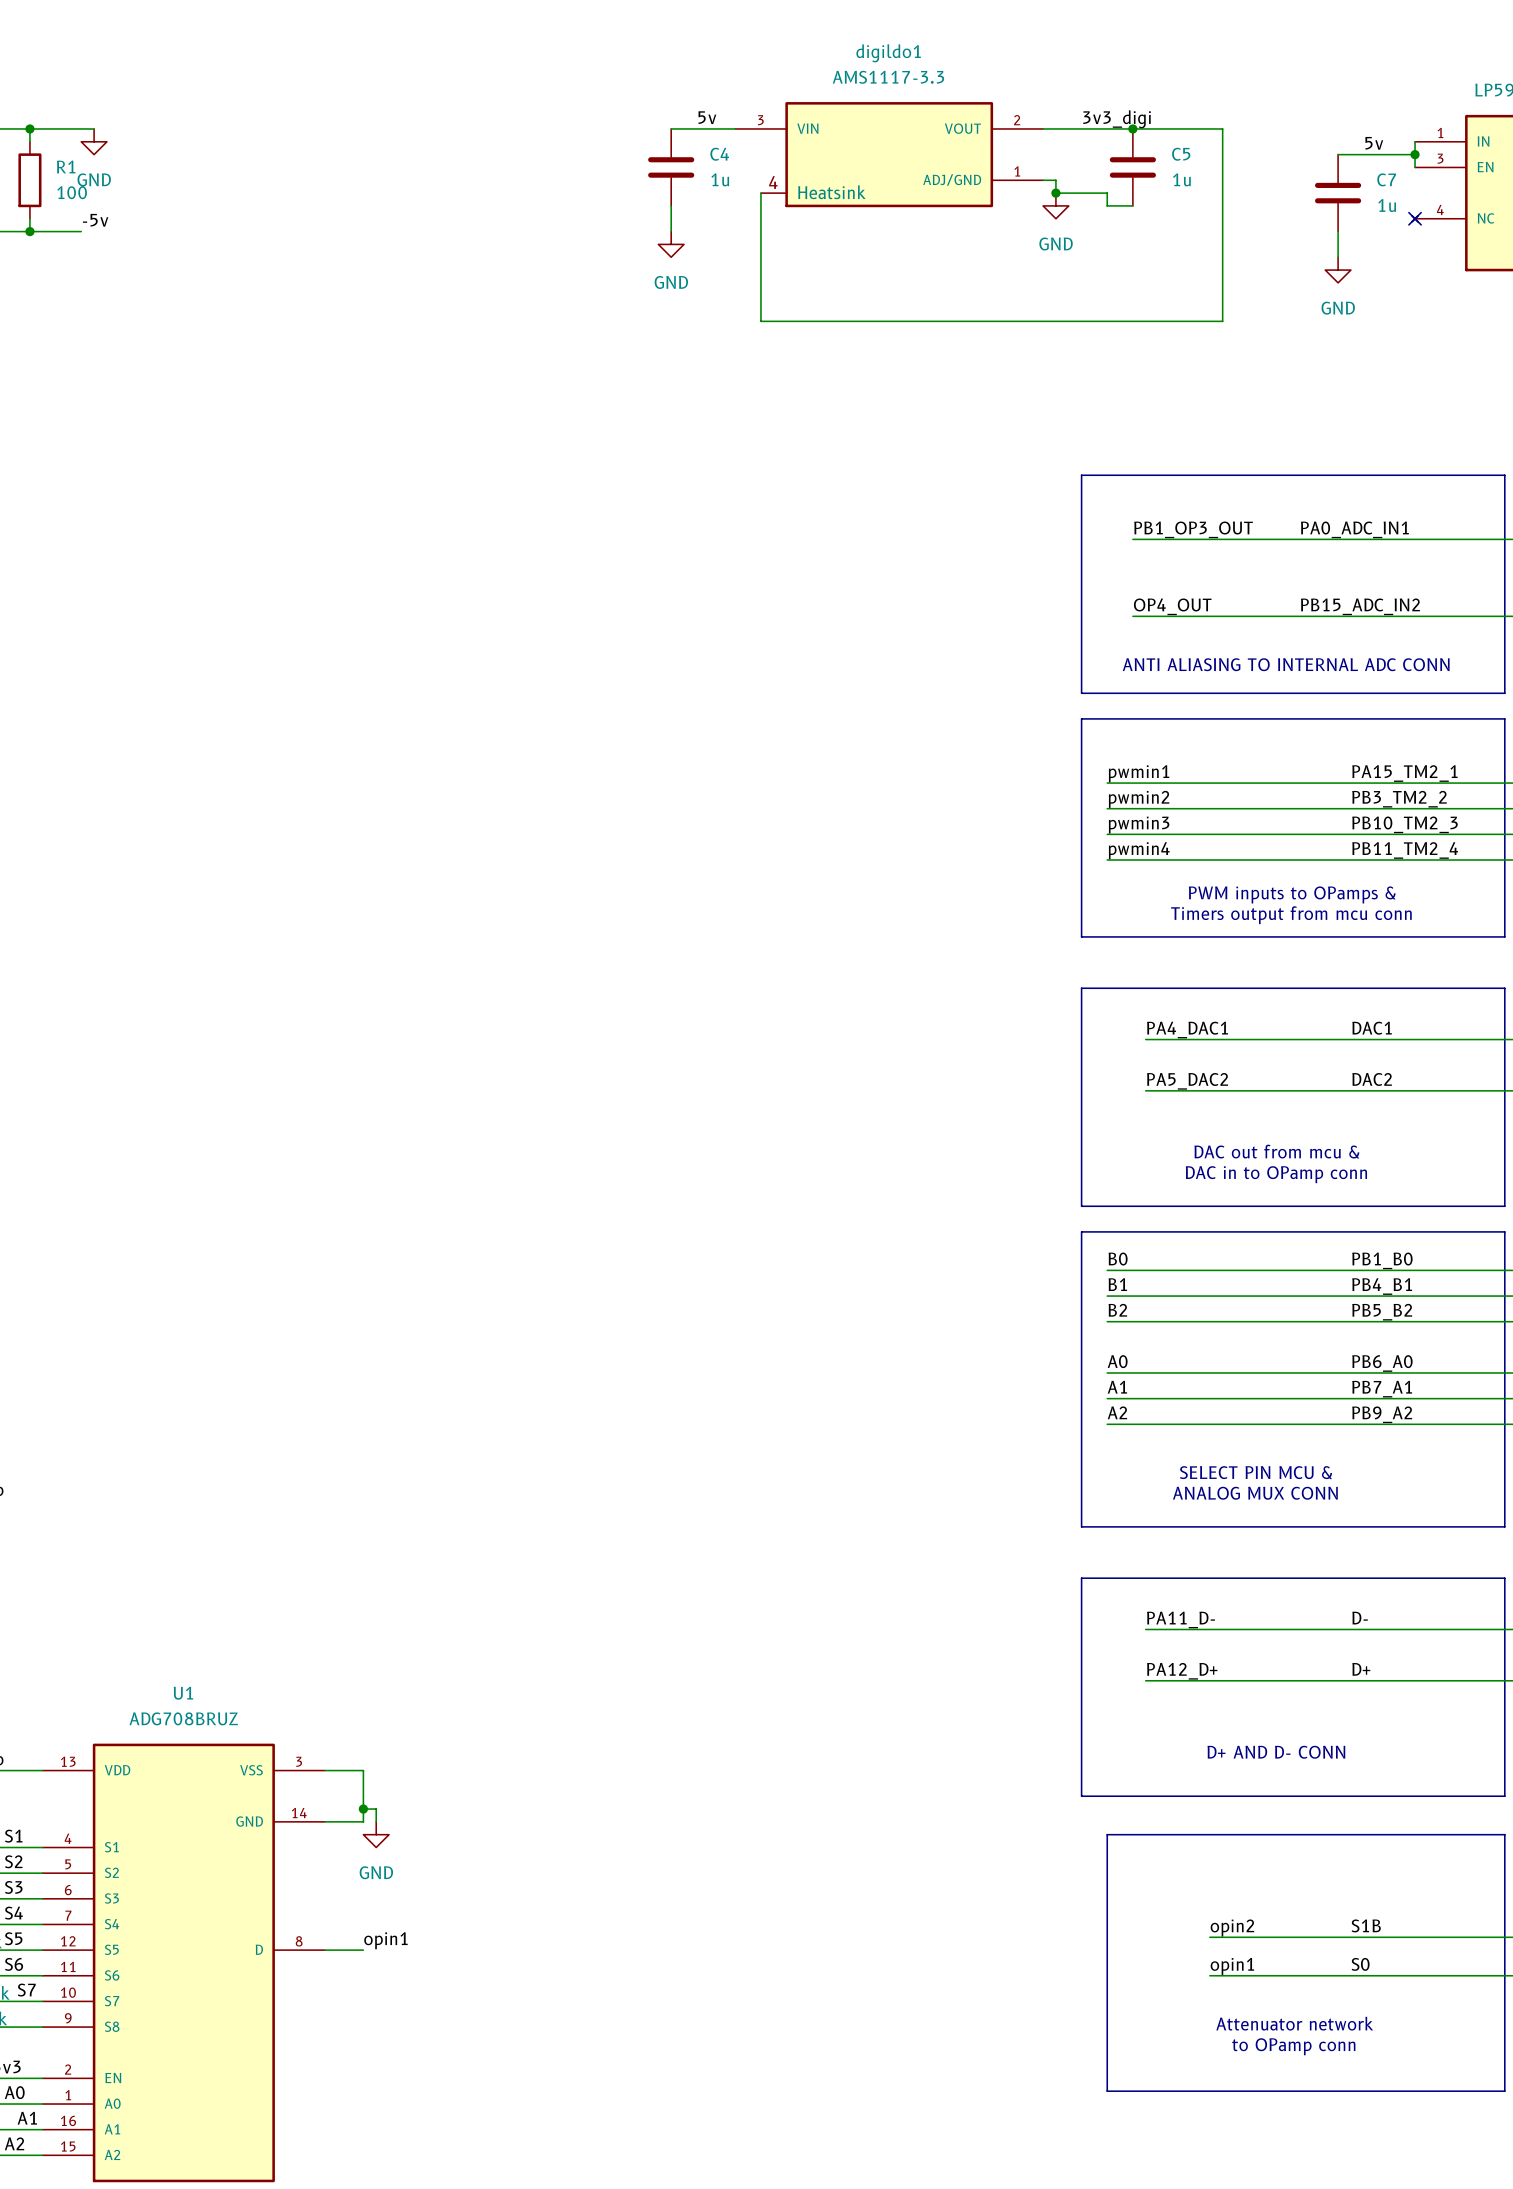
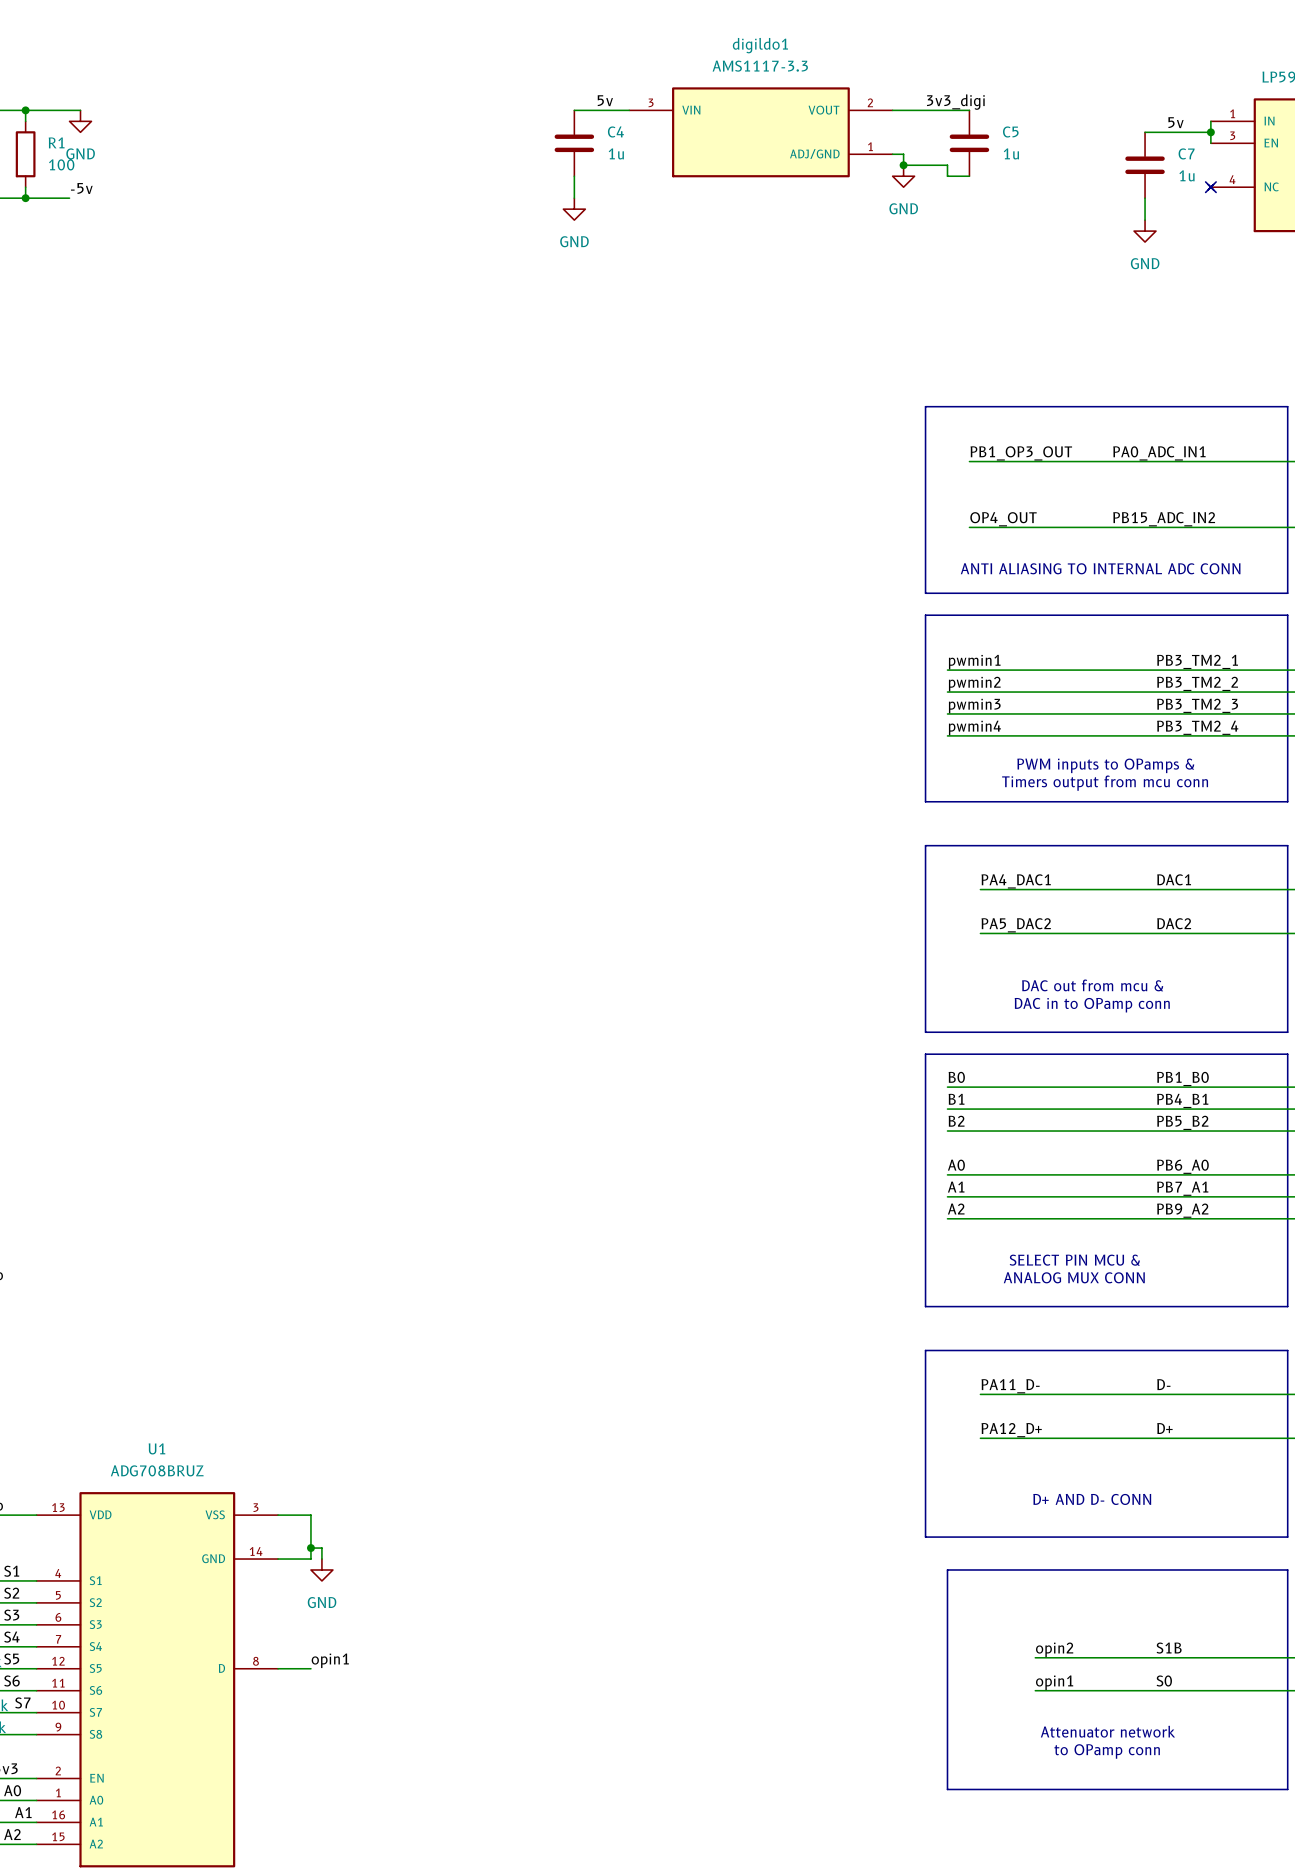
digildo1 symbol: [735, 102, 1044, 208] -> [629, 87, 893, 178]
wire: (1132, 128) (1222, 128) (1222, 321) (760, 321) (760, 193) -> none
junction: (1132, 128) -> none
label: PA15_TM2_1 (1404, 773) -> PB3_TM2_1 (1197, 661)
label: PB10_TM2_3 (1404, 824) -> PB3_TM2_3 (1197, 705)
label: PB11_TM2_4 (1405, 850) -> PB3_TM2_4 (1197, 727)

